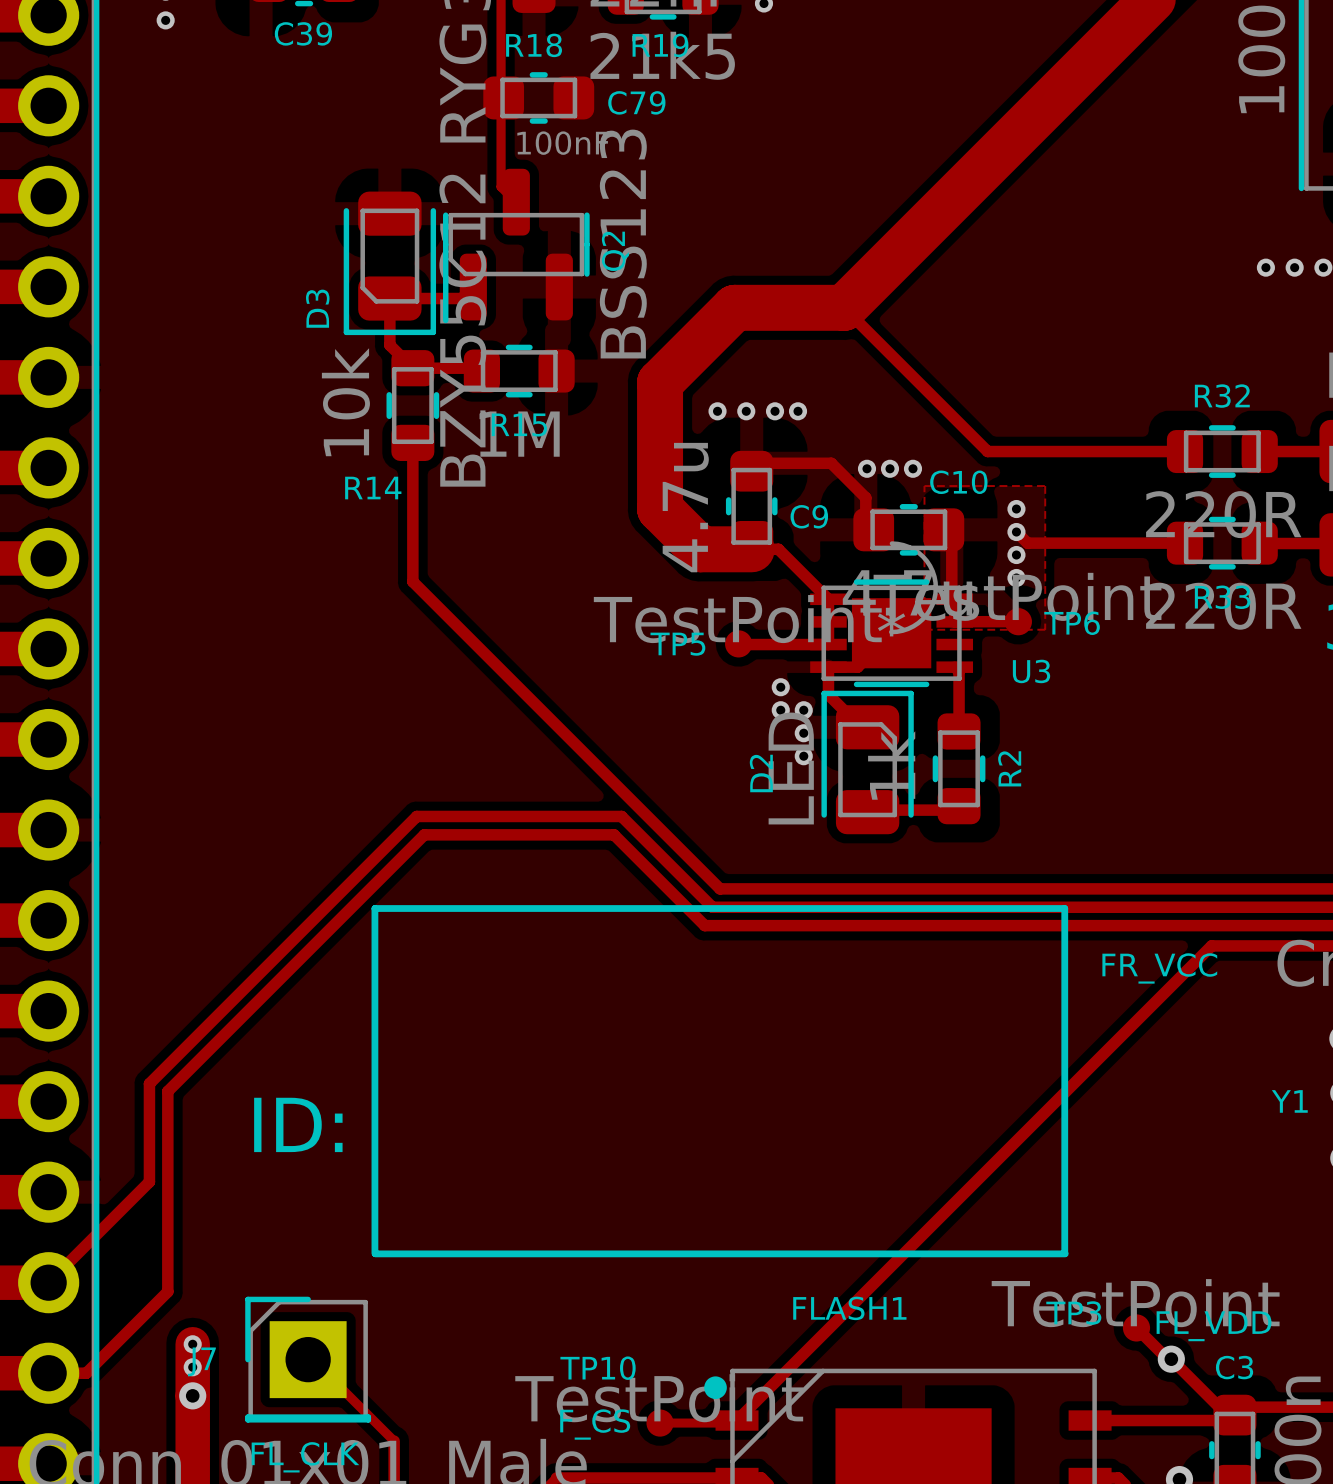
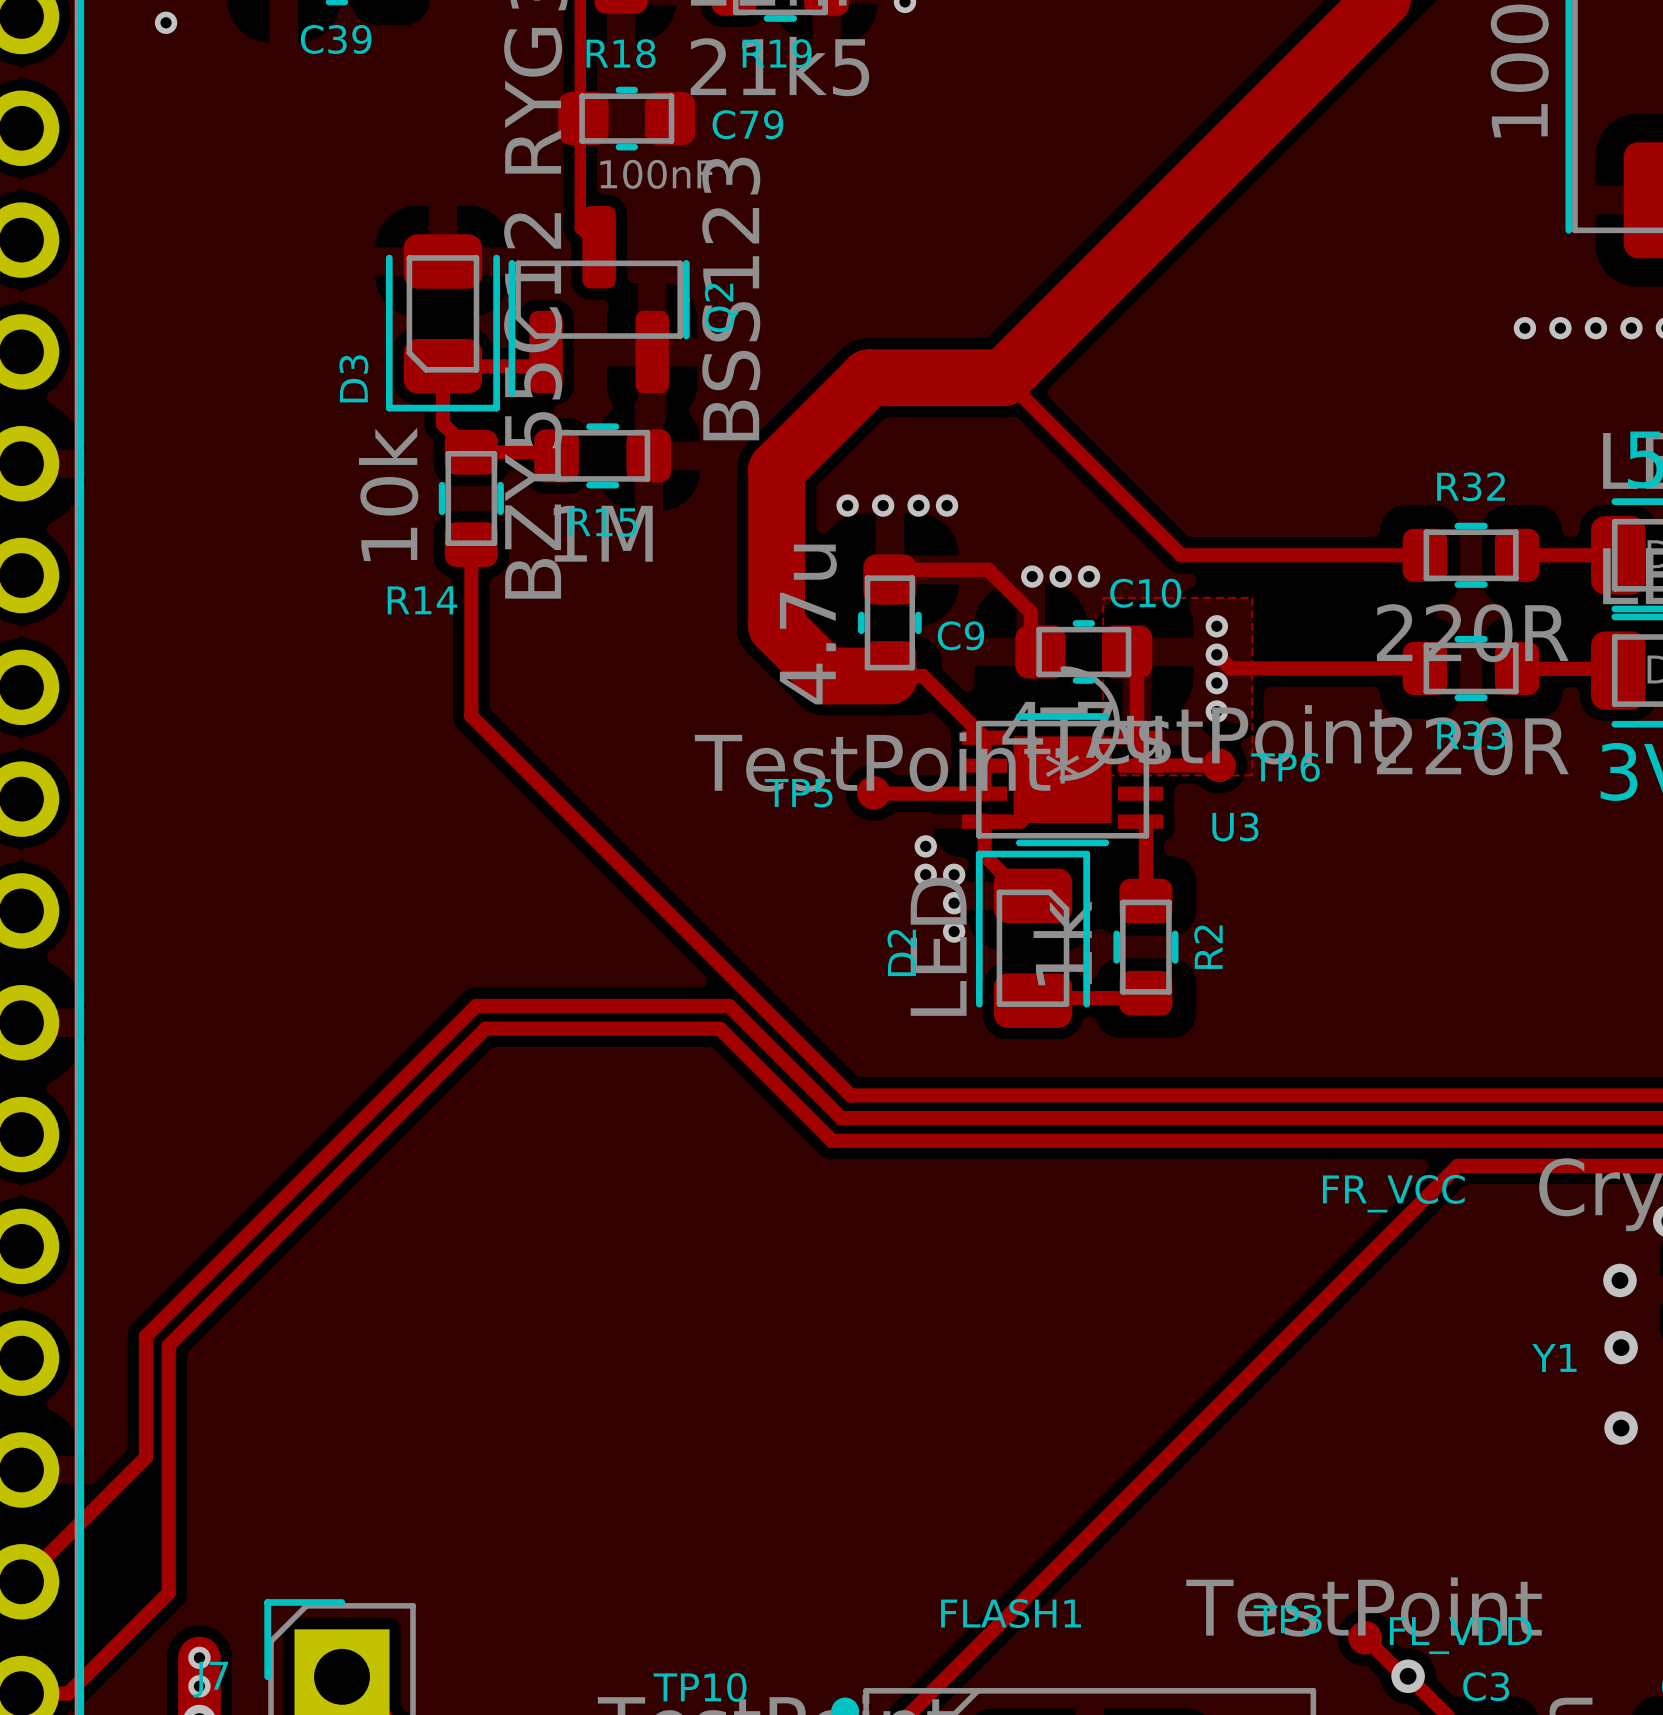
text: ID: (298, 1124) -> none
line: (374, 1253) (374, 908) (1064, 908) (1064, 1253) -> none
line: (375, 1253) (1065, 1253) -> none

